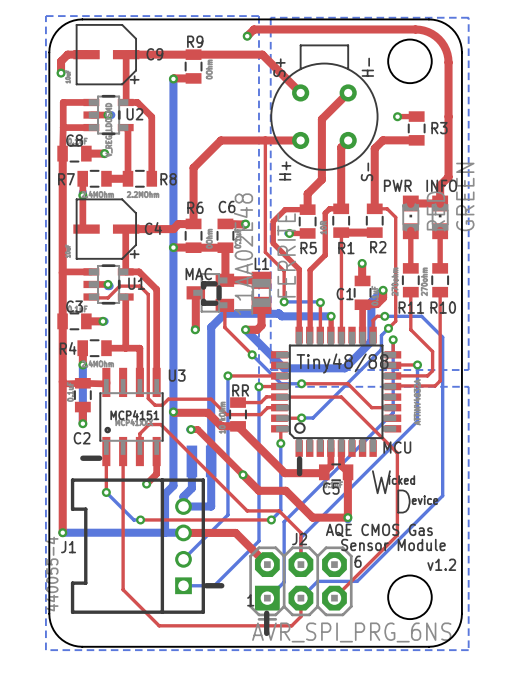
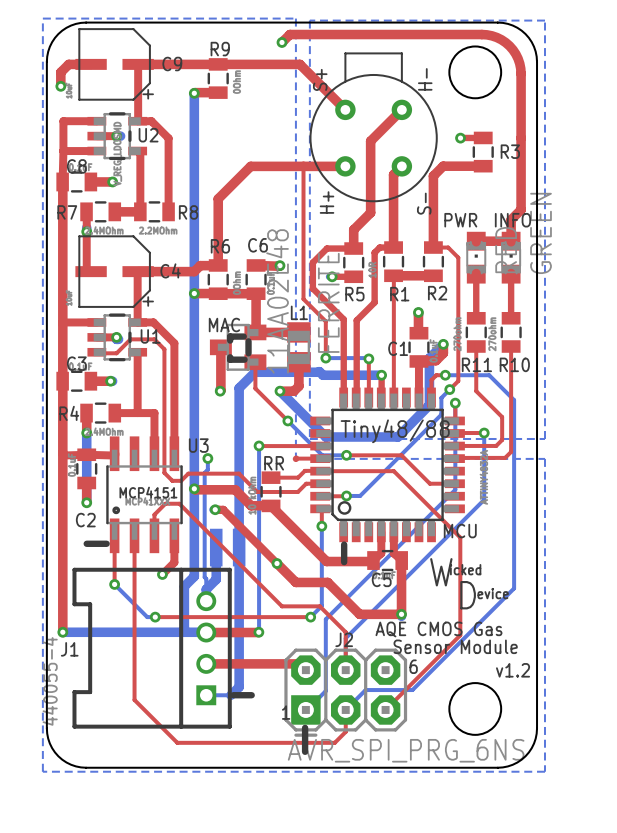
bottom track: none -> (207, 458) (207, 469) (204, 472) (206, 589)
bottom track: (258, 386) (258, 541) (214, 585) (204, 585) -> none
via position: (258, 386) -> (207, 458)
bottom track: (183, 506) (211, 506) -> (230, 695) (239, 687) (239, 601)
bottom track: (227, 514) (183, 559) -> (259, 611) (259, 632)
top track: (227, 532) (235, 532) (262, 559) -> (206, 663) (299, 663)
via: none -> (258, 632)

